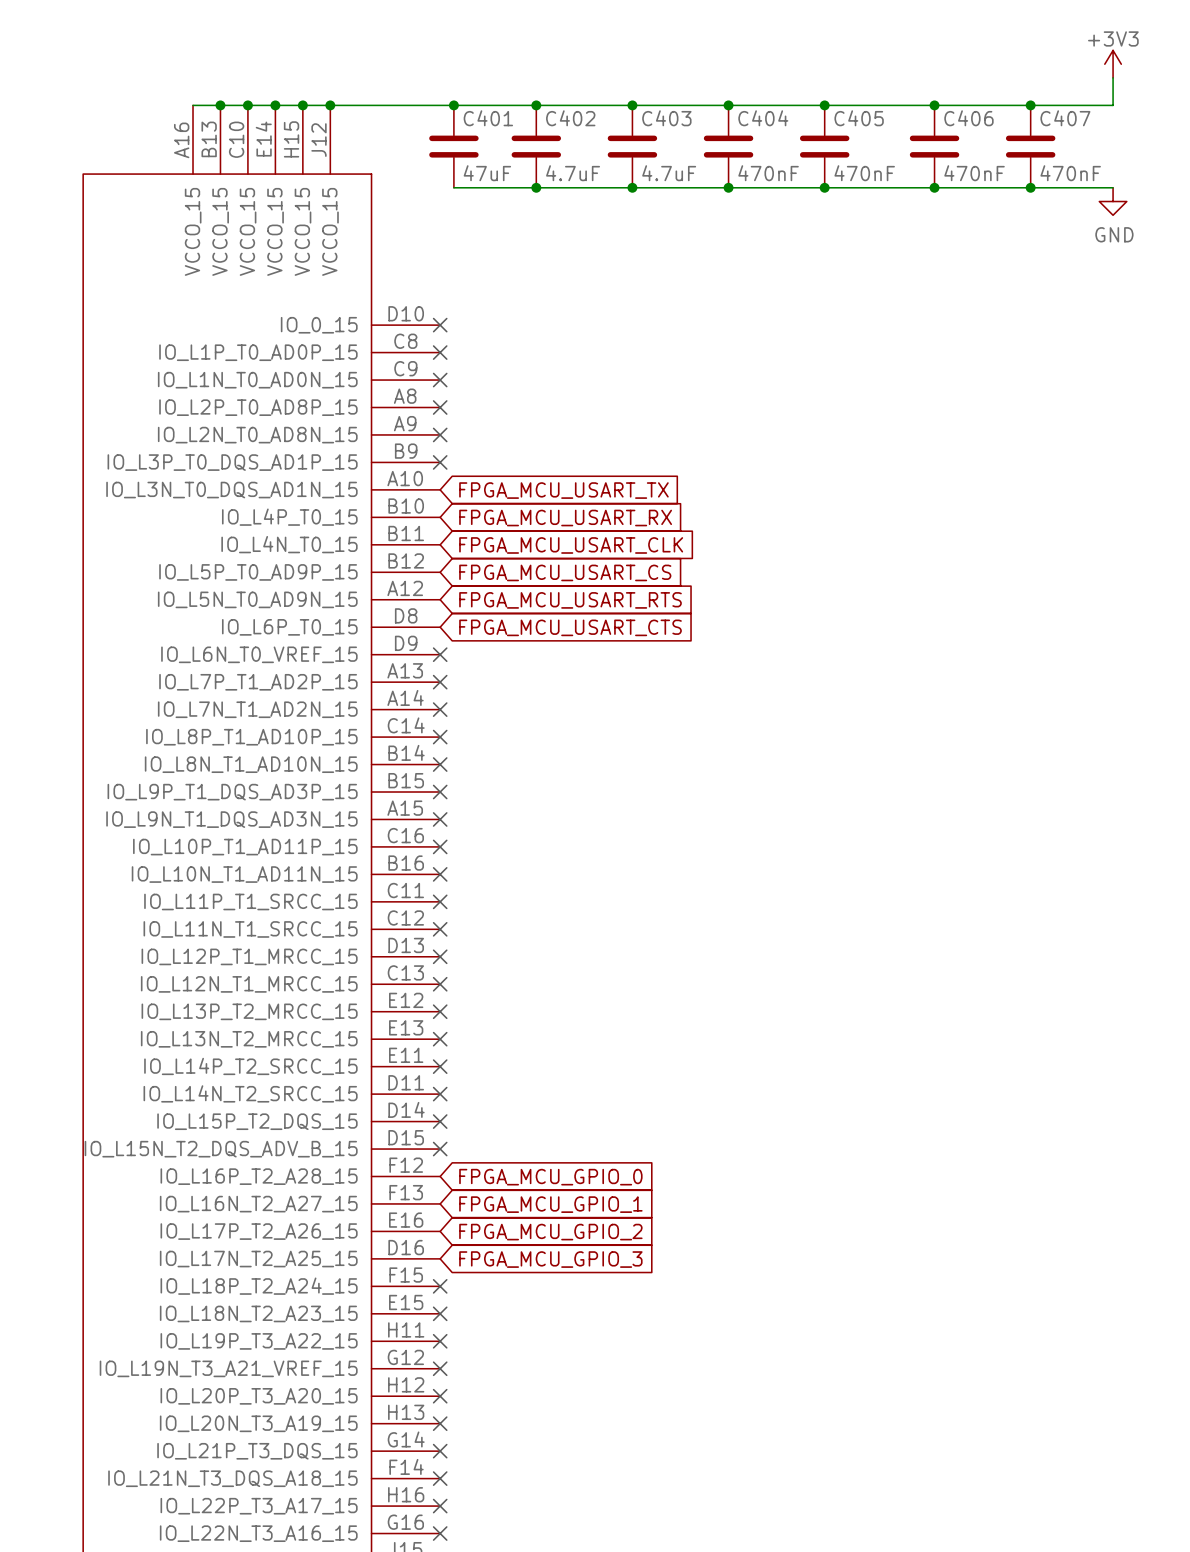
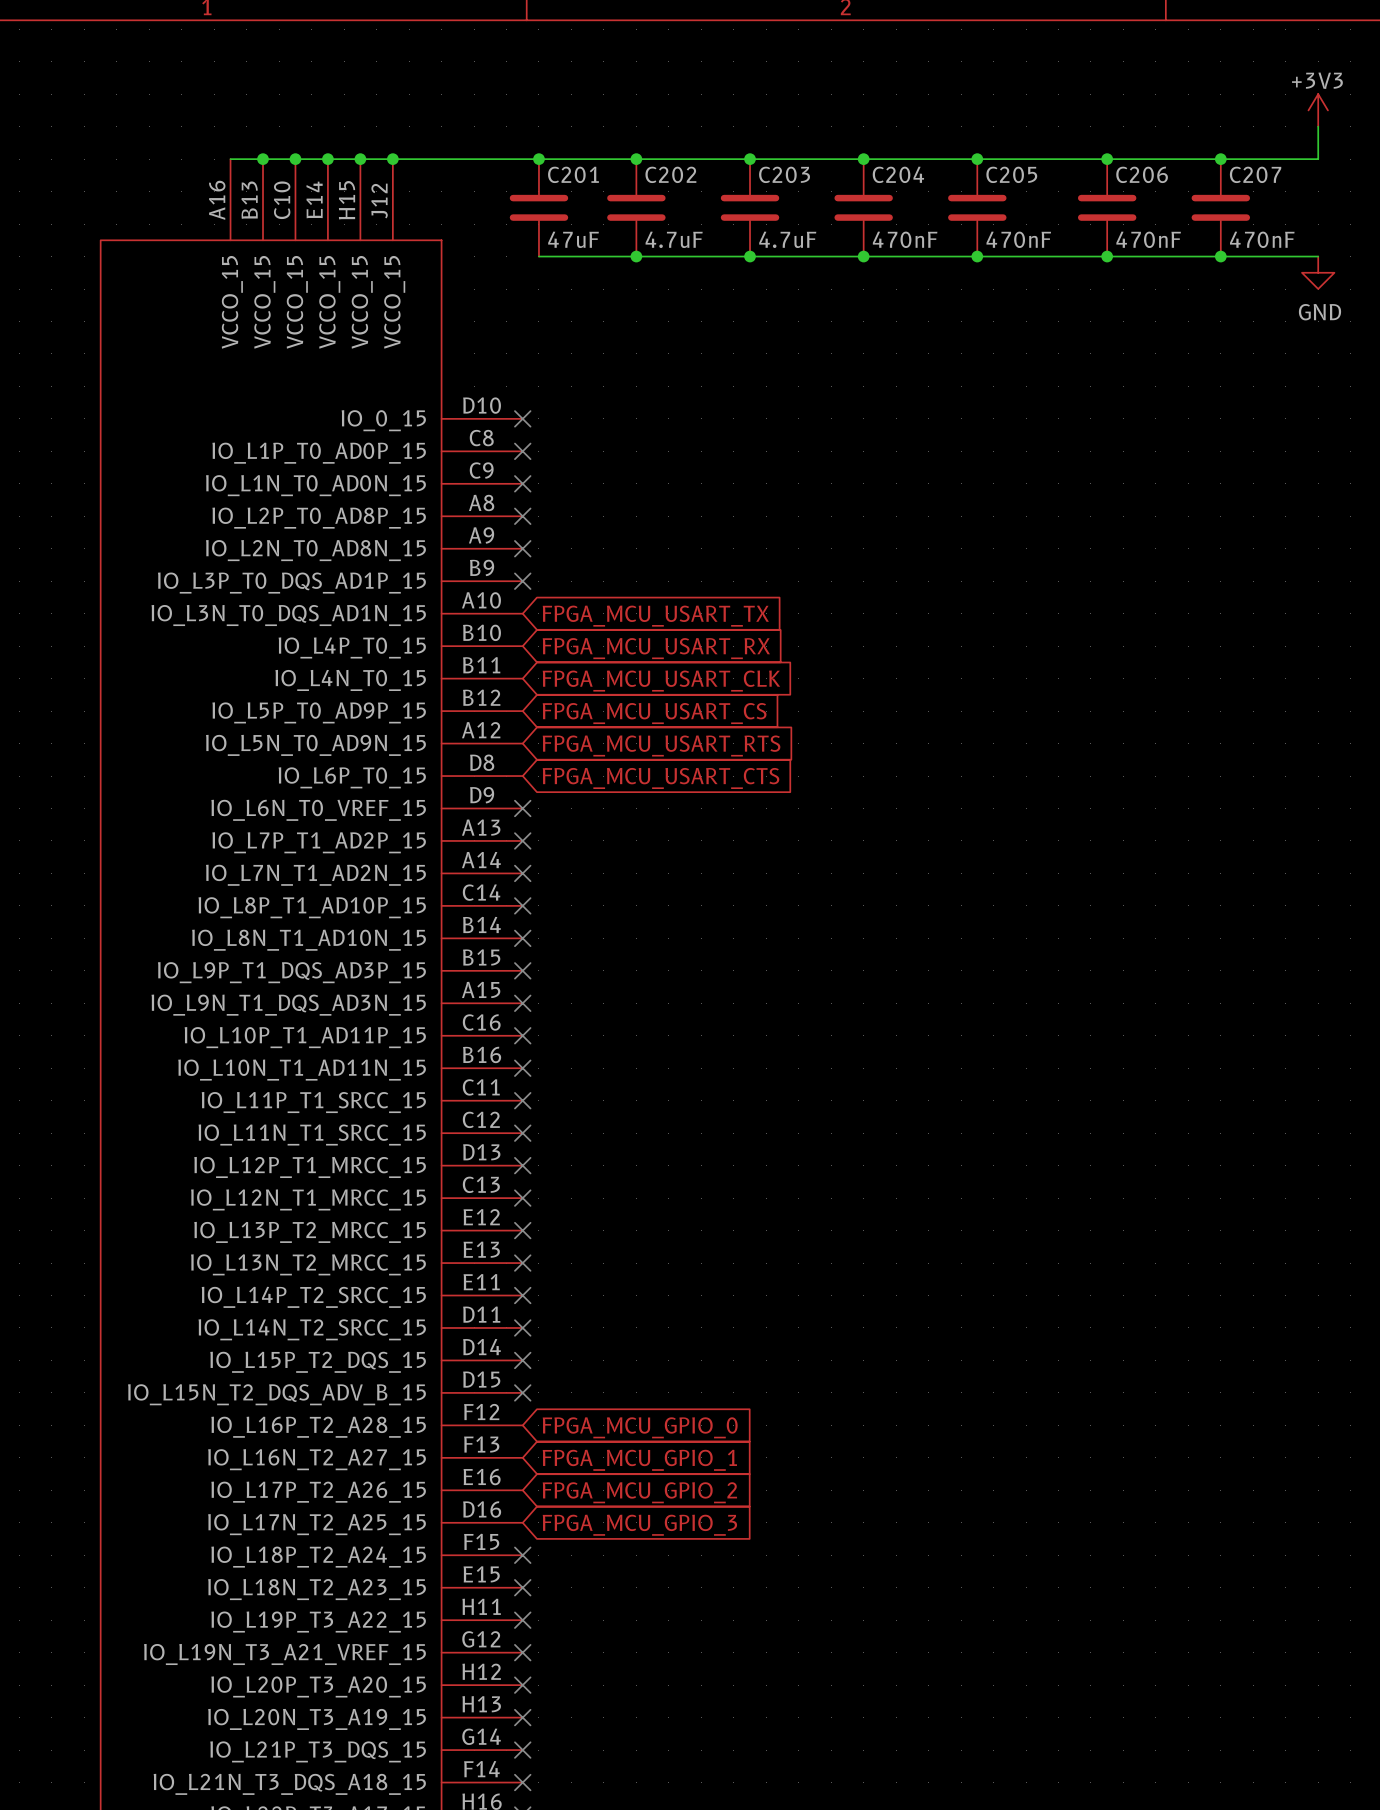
C401 name: C401 (488, 118) -> C201 (573, 174)
C402 name: C402 (570, 118) -> C202 (670, 174)
C403 name: C403 (666, 118) -> C203 (784, 174)
C404 name: C404 (763, 118) -> C204 (898, 174)
C405 name: C405 (859, 118) -> C205 (1011, 174)
C406 name: C406 (968, 118) -> C206 (1142, 174)
C407 name: C407 (1065, 118) -> C207 (1255, 174)

